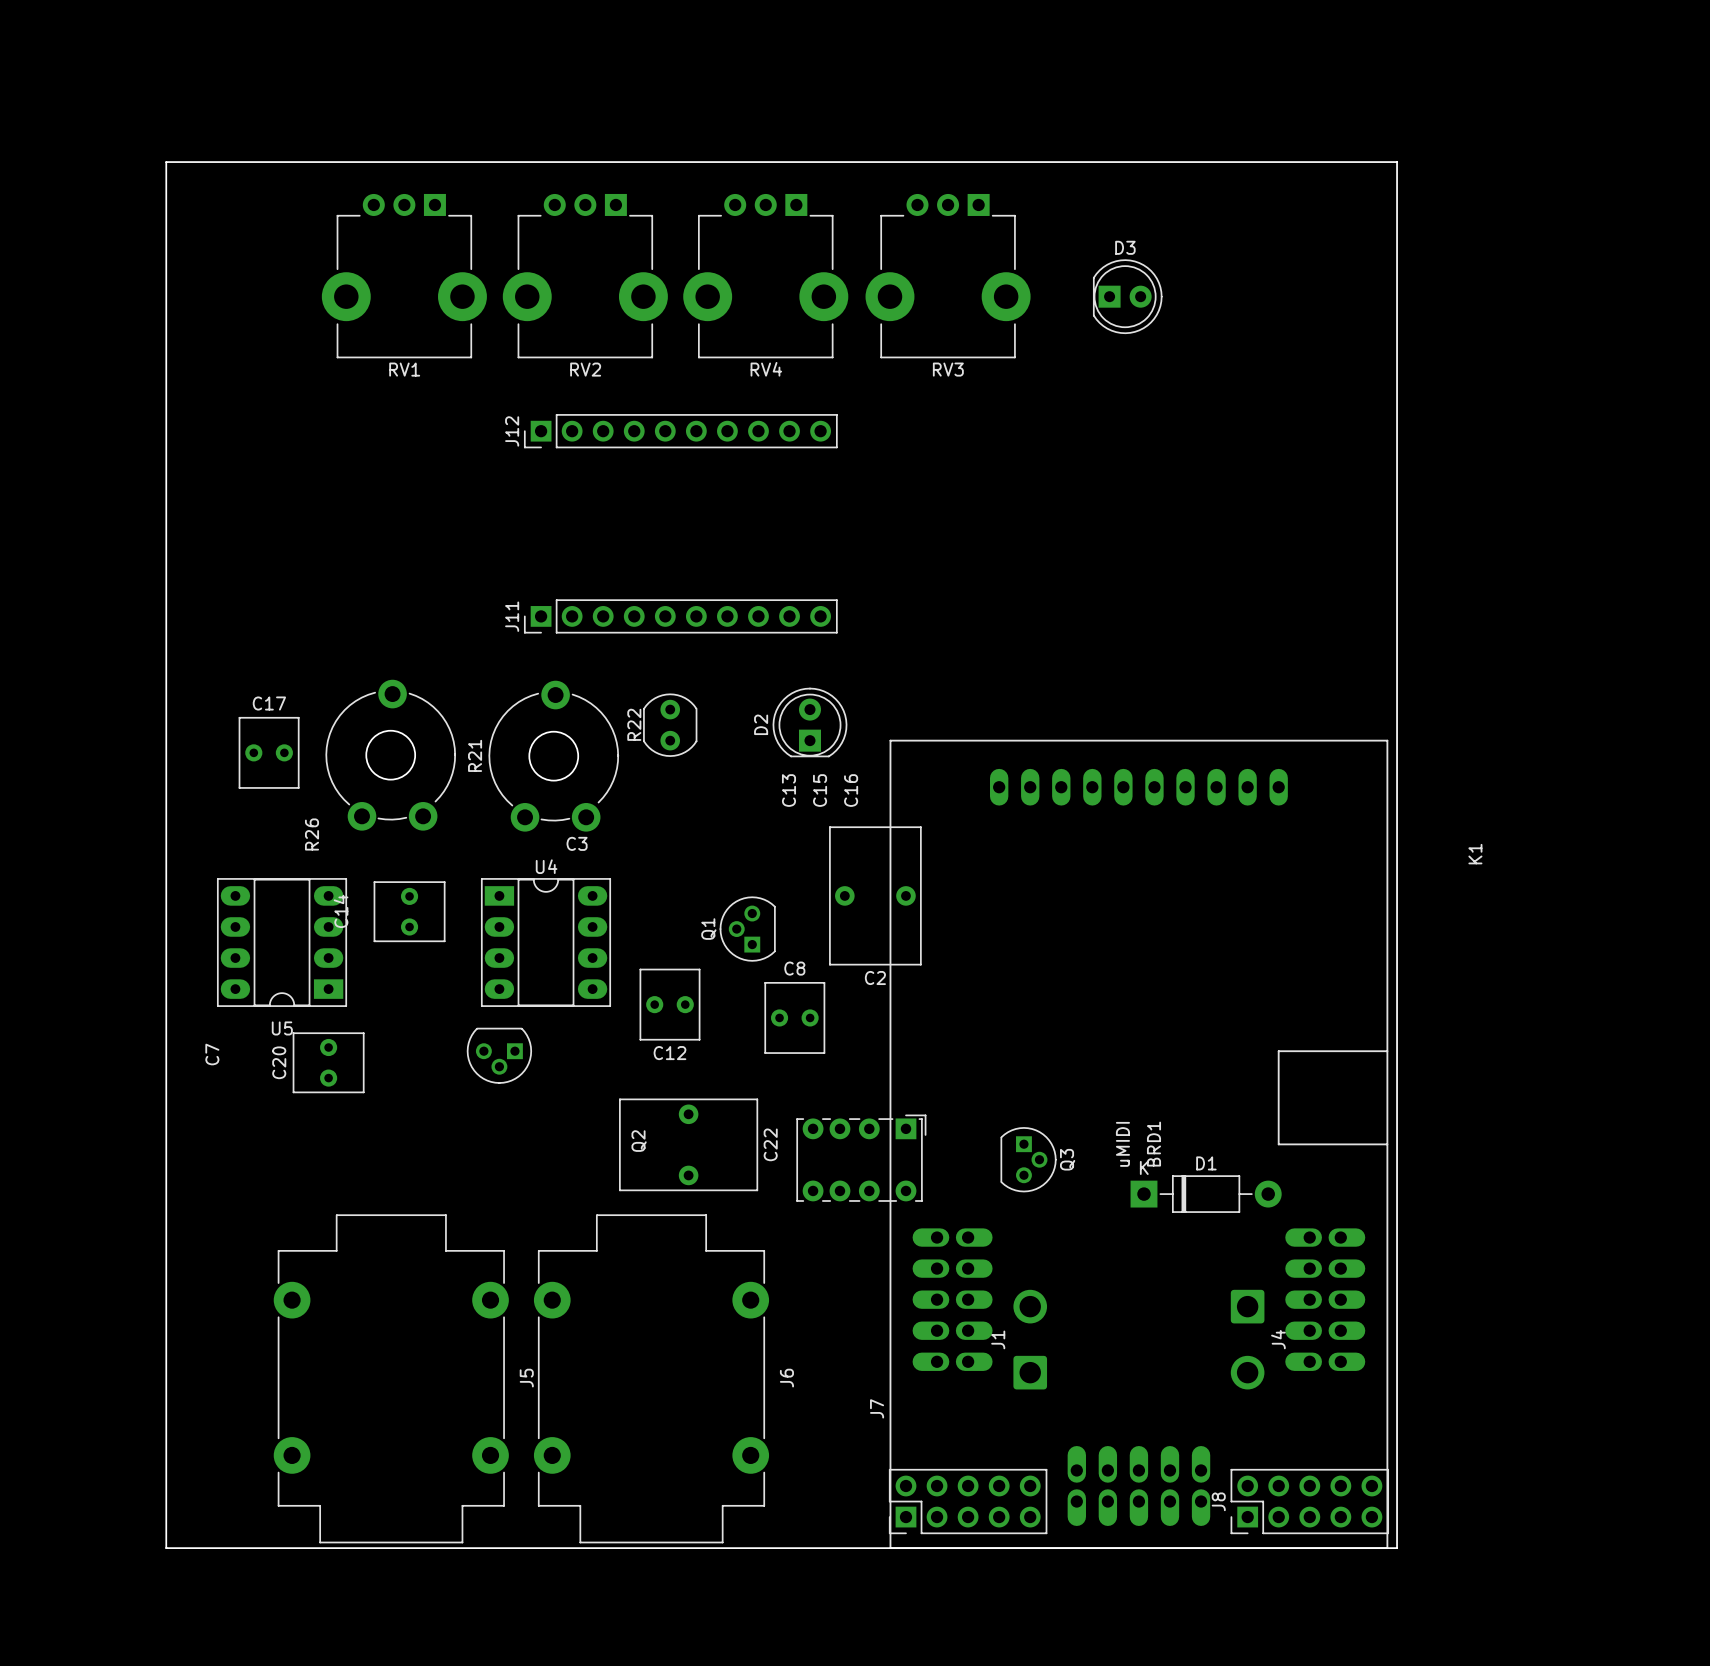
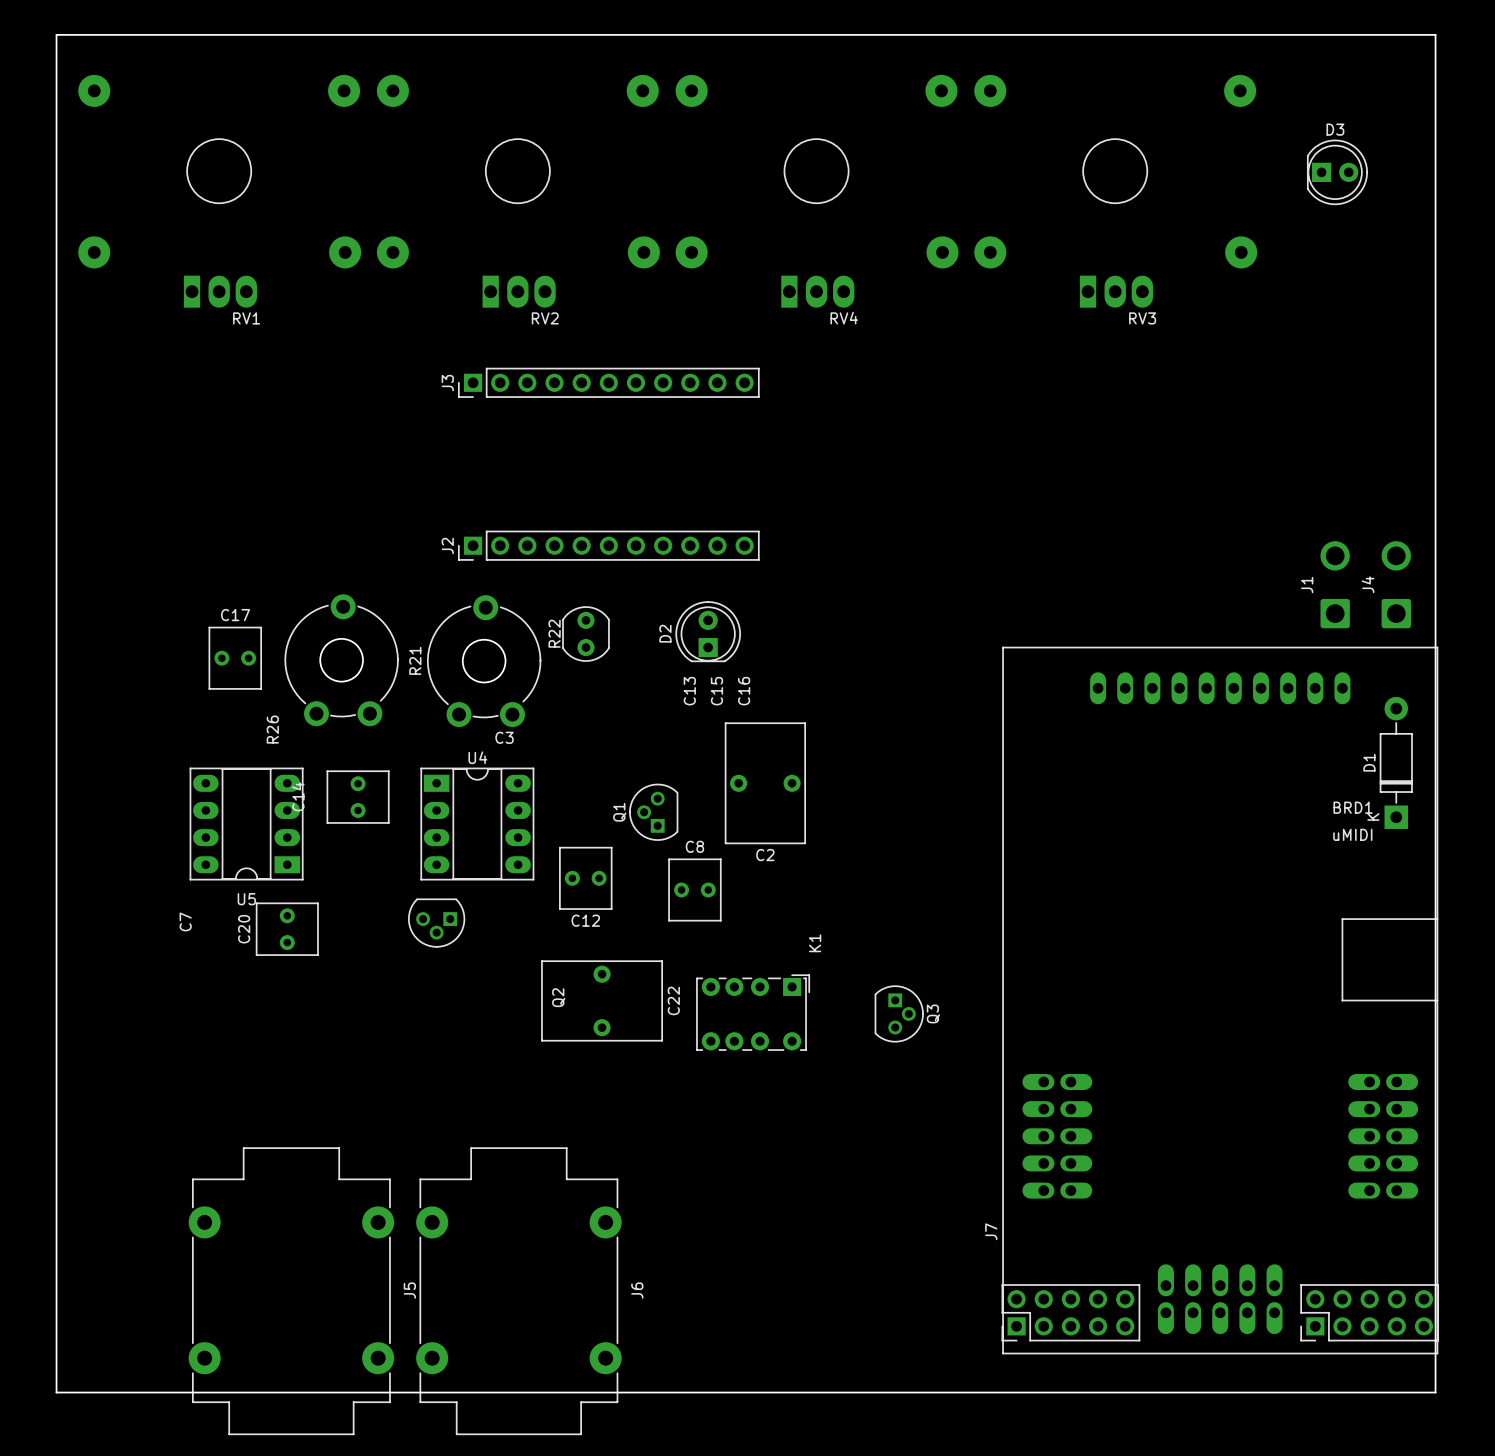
board edge: (166, 162) (1397, 162) (1397, 1548) (166, 1548) (166, 162) -> (56, 34) (56, 1392) (1435, 1392) (1435, 34) (56, 34)
RV1 footprint: [321, 193, 487, 359] -> [78, 74, 362, 308]
RV2 footprint: [502, 193, 668, 359] -> [376, 74, 660, 308]
RV4 footprint: [683, 193, 849, 359] -> [675, 74, 959, 308]
RV3 footprint: [865, 193, 1031, 359] -> [974, 74, 1258, 308]
D3 position: (1127, 296) -> (1337, 172)
RV1 name position: RV1 (404, 369) -> RV1 (246, 318)
RV2 name position: RV2 (585, 369) -> RV2 (545, 318)
RV4 name position: RV4 (766, 369) -> RV4 (844, 318)
RV3 name position: RV3 (948, 369) -> RV3 (1142, 318)
J12: (680, 431) -> none
J3: none -> (608, 382)
J11: (680, 616) -> none
J2: none -> (608, 545)
K1 name position: K1 (1475, 854) -> K1 (815, 943)
BRD1 value rotation: 0° (1122, 1144) -> 90° clockwise (1352, 834)
BRD1 value position: uMIDI (1122, 1144) -> uMIDI (1352, 834)
BRD1 position: (1138, 1144) -> (1220, 1000)
BRD1 name rotation: 0° (1154, 1144) -> 90° clockwise (1353, 807)
BRD1 name position: BRD1 (1154, 1144) -> BRD1 (1353, 807)
D1 rotation: 0° (1206, 1194) -> 90° counterclockwise (1396, 762)
D1 position: (1206, 1194) -> (1396, 762)
J1 position: (1030, 1339) -> (1335, 584)
J4 rotation: 0° (1247, 1339) -> 180° (1396, 584)
J4 position: (1247, 1339) -> (1396, 584)
J5 position: (391, 1378) -> (291, 1291)
J6 position: (651, 1378) -> (518, 1291)
J7 position: (968, 1501) -> (1070, 1312)
J8: (1309, 1501) -> none
part: none -> (1369, 1312)

